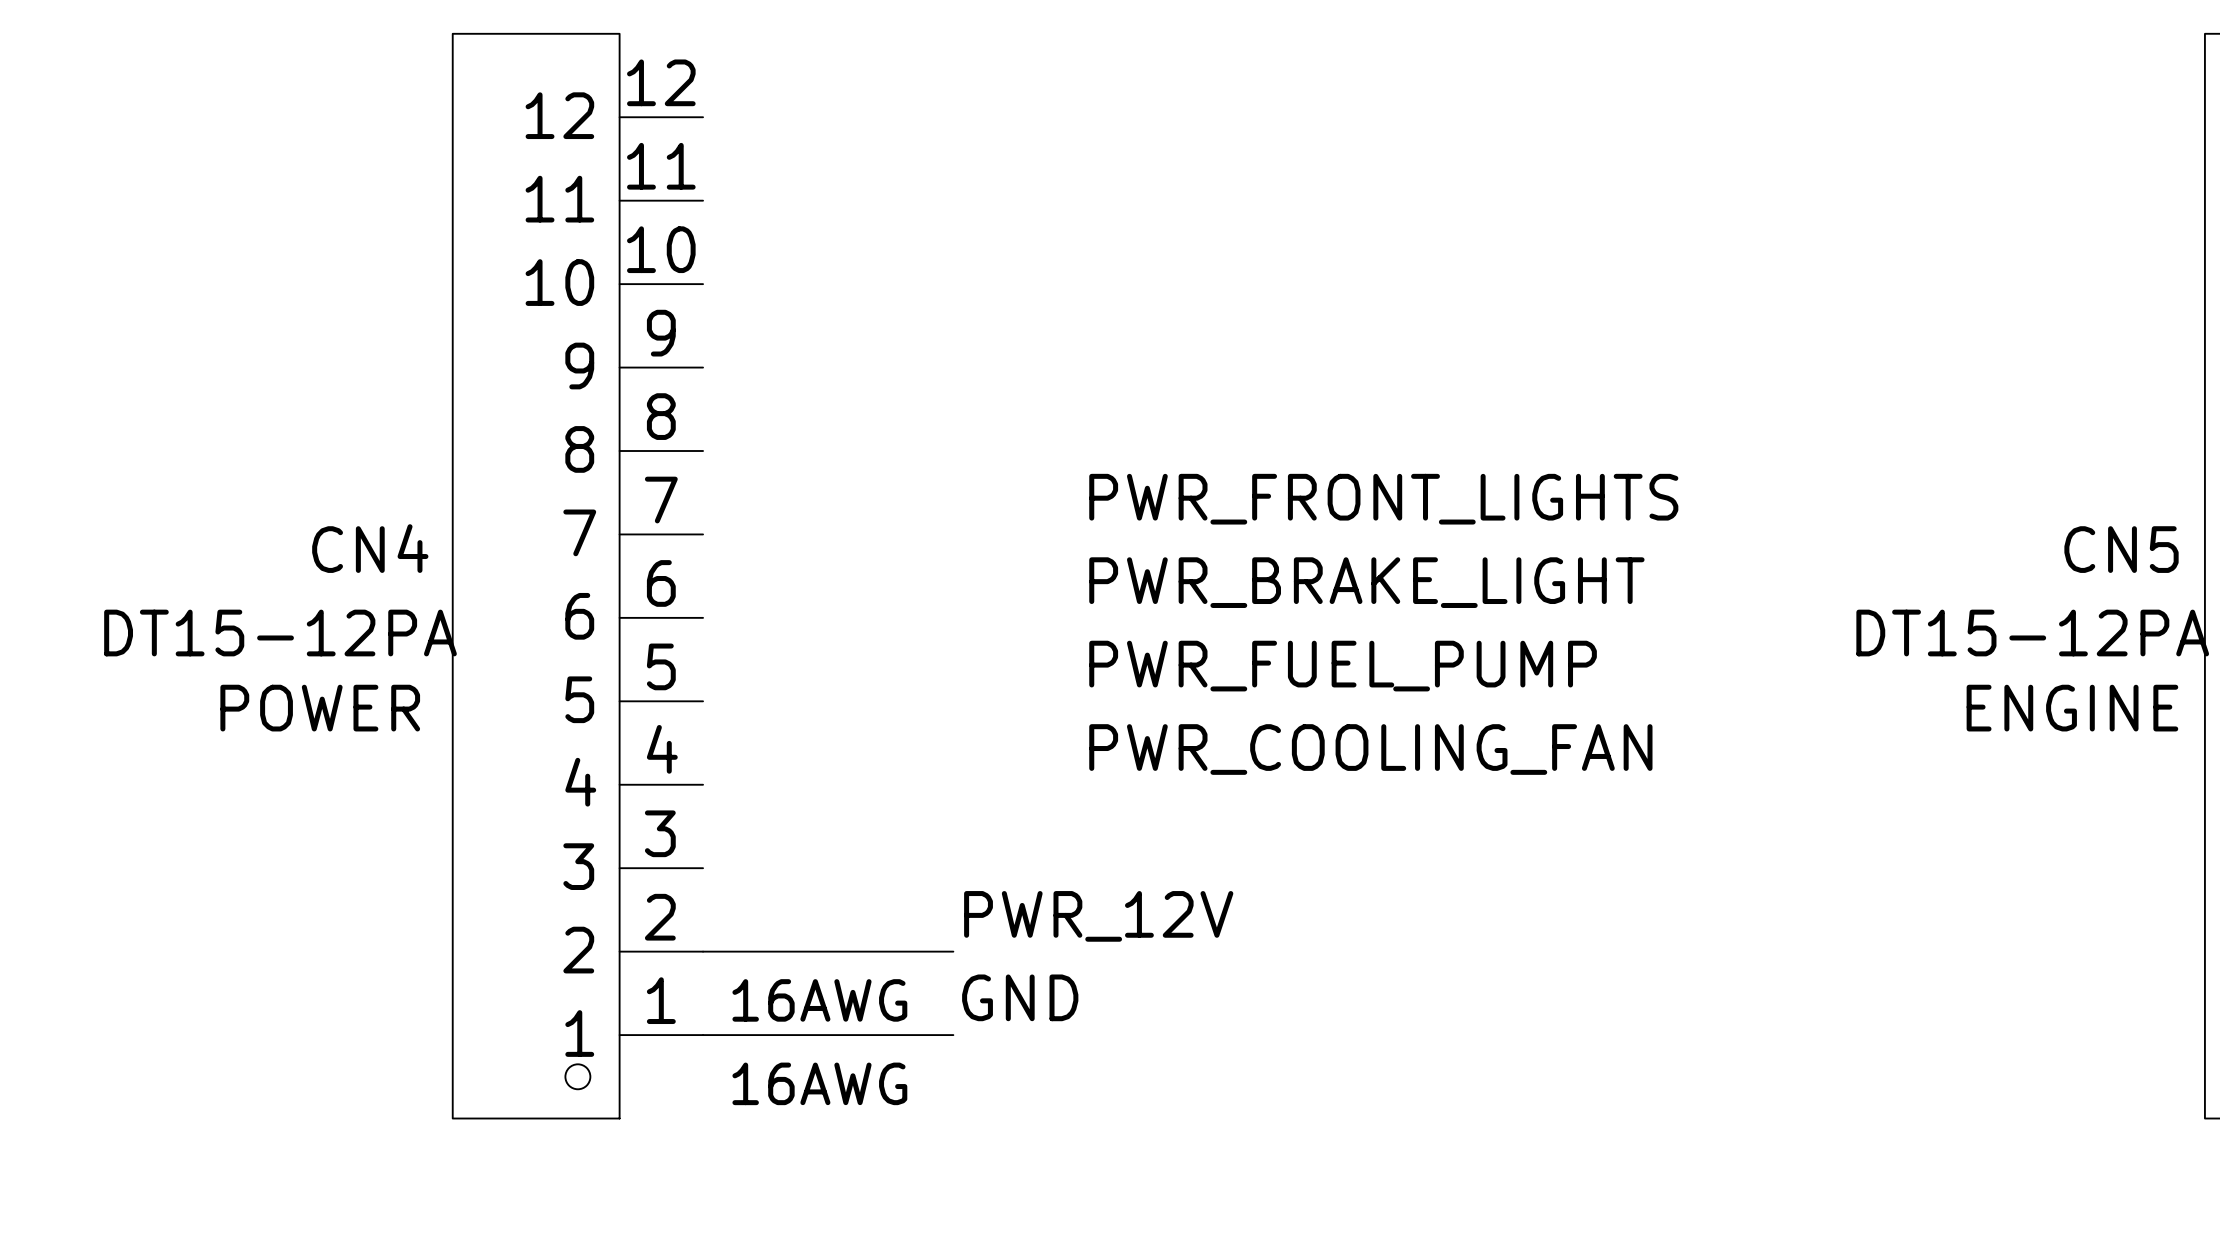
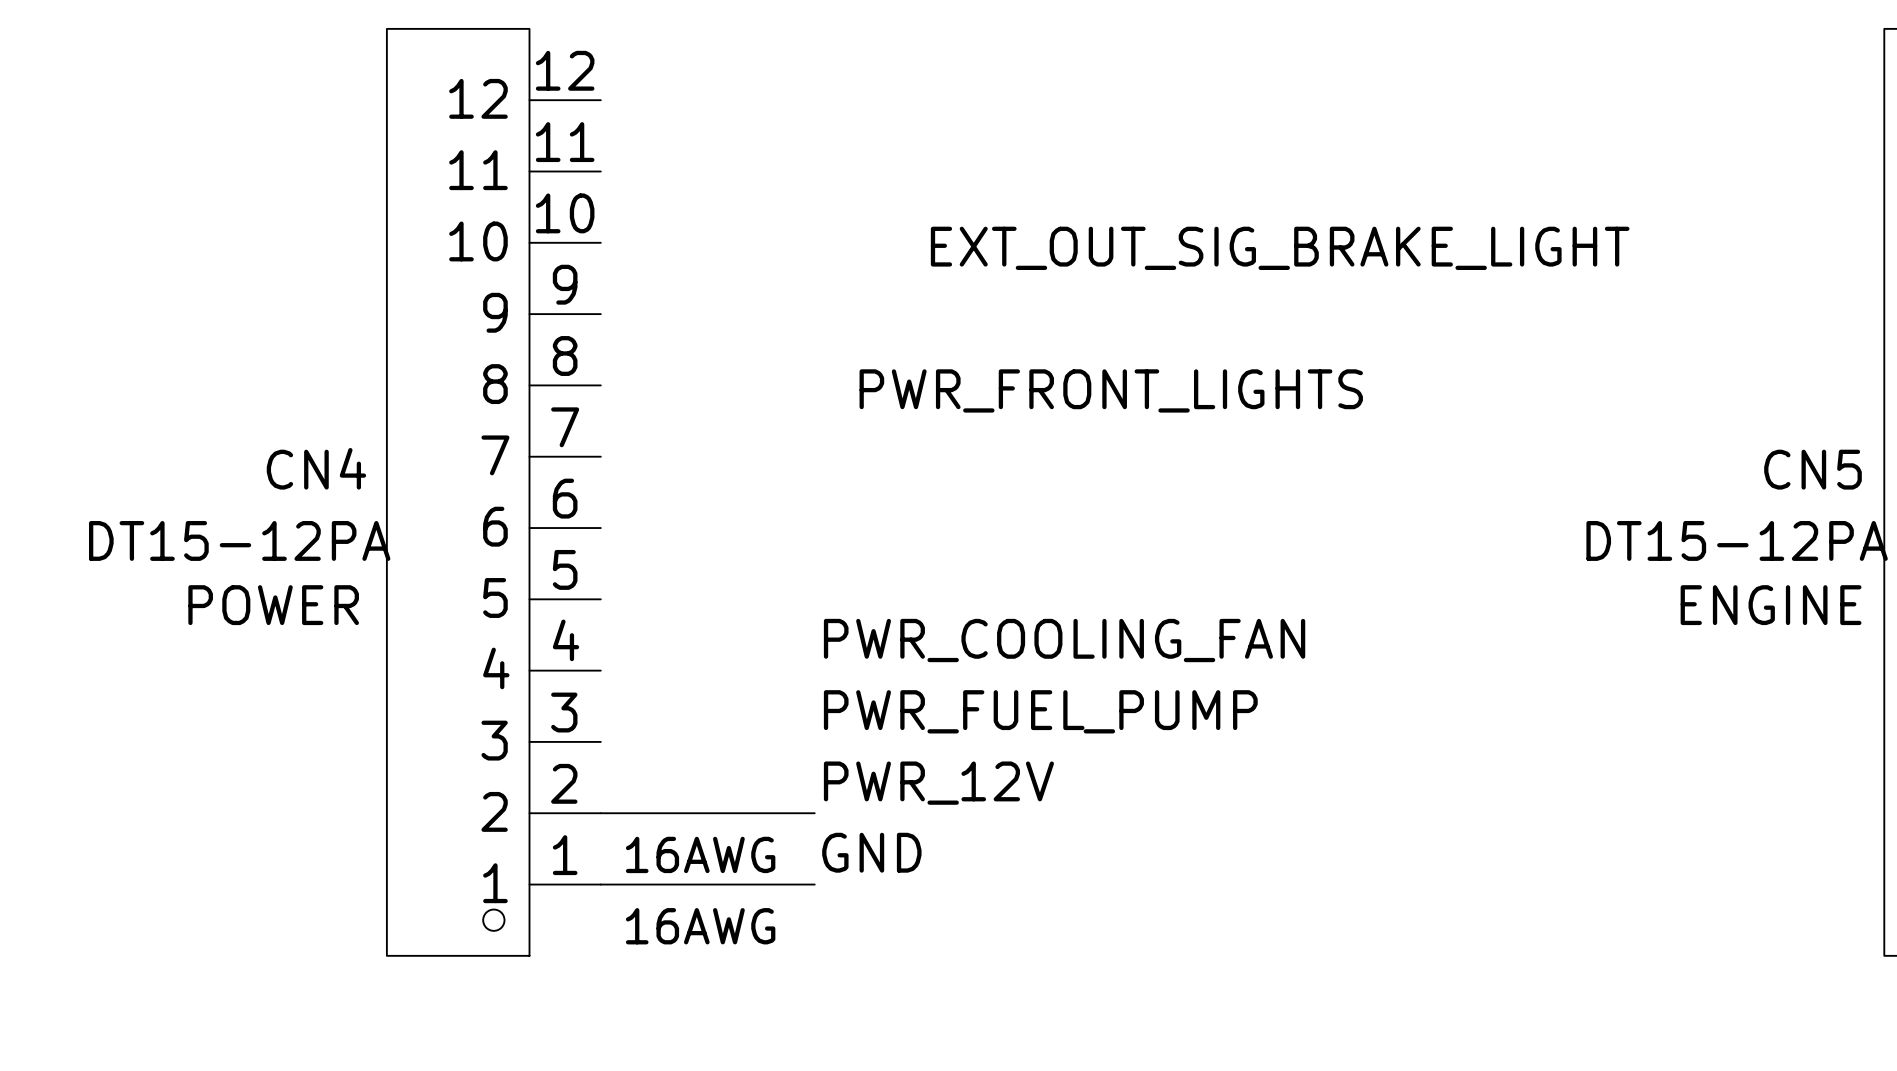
label: none -> EXT_OUT_SIG_BRAKE_LIGHT (1280, 248)
label position: PWR_FRONT_LIGHTS (1383, 499) -> PWR_FRONT_LIGHTS (1111, 390)
label: PWR_BRAKE_LIGHT (1366, 582) -> none
label position: PWR_FUEL_PUMP (1343, 666) -> PWR_FUEL_PUMP (1040, 711)
label position: PWR_COOLING_FAN (1370, 749) -> PWR_COOLING_FAN (1064, 640)

